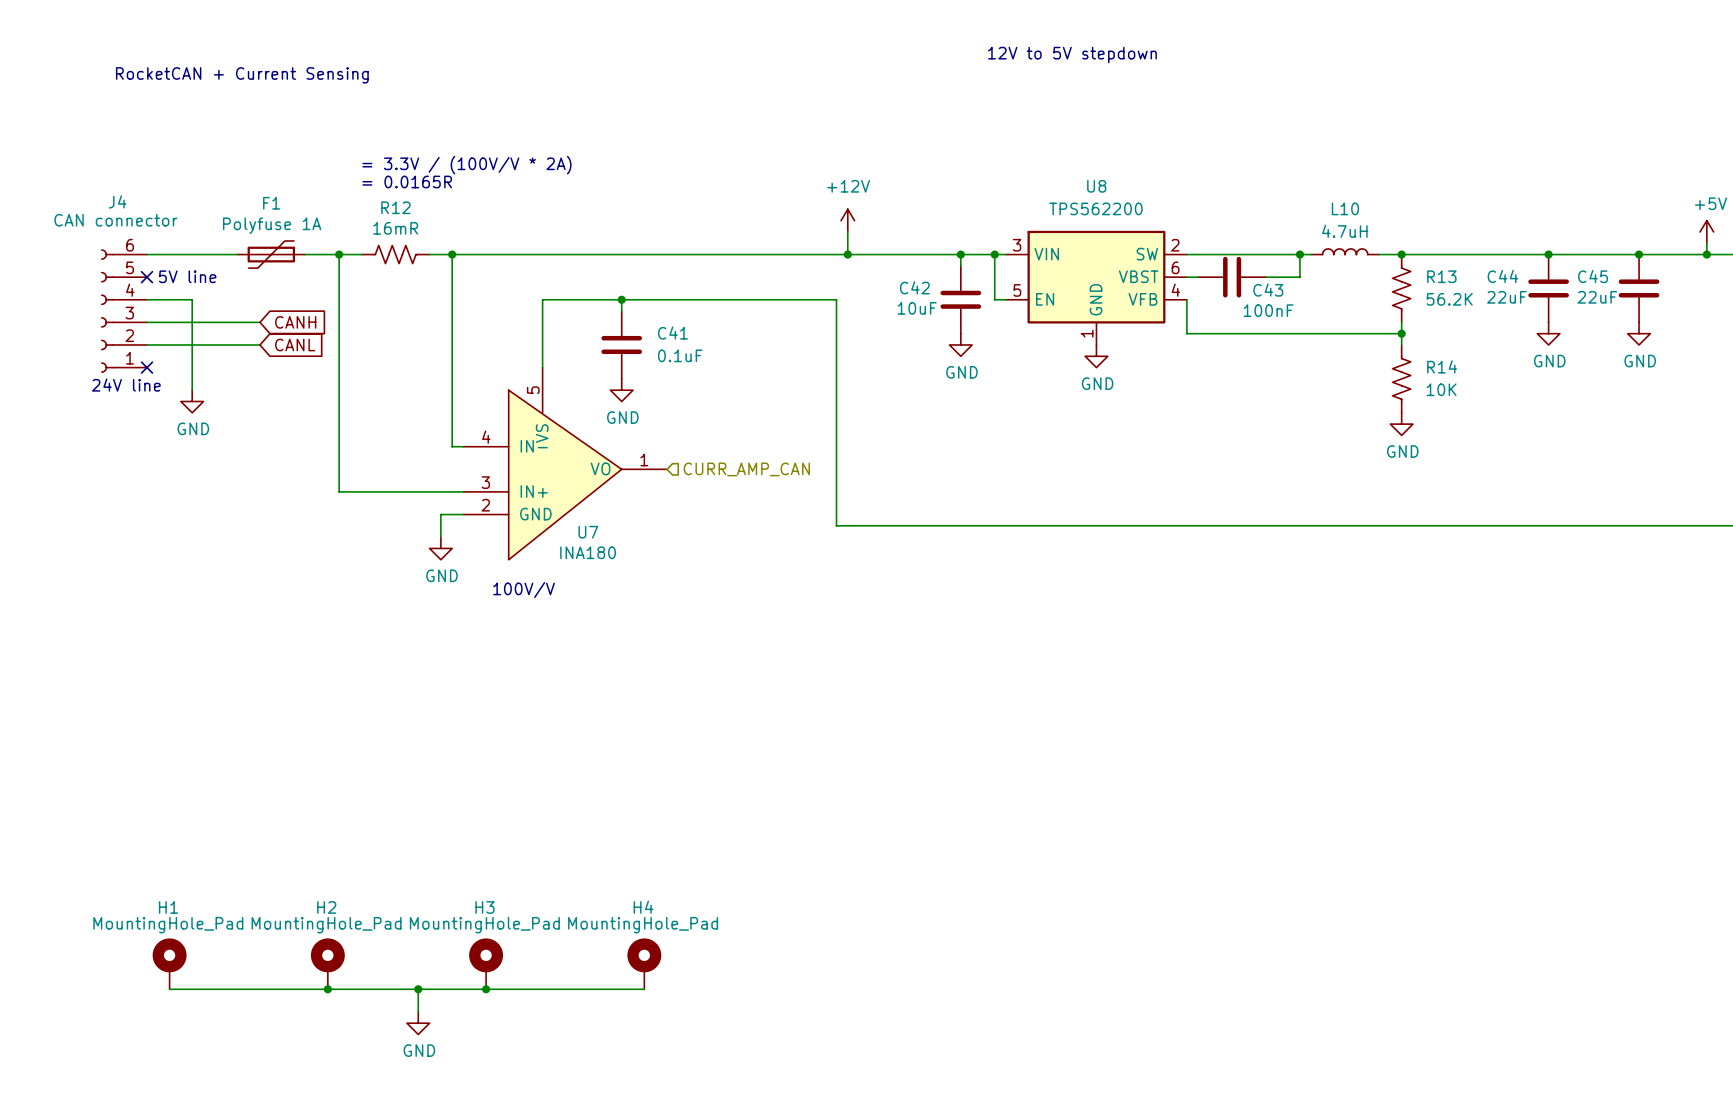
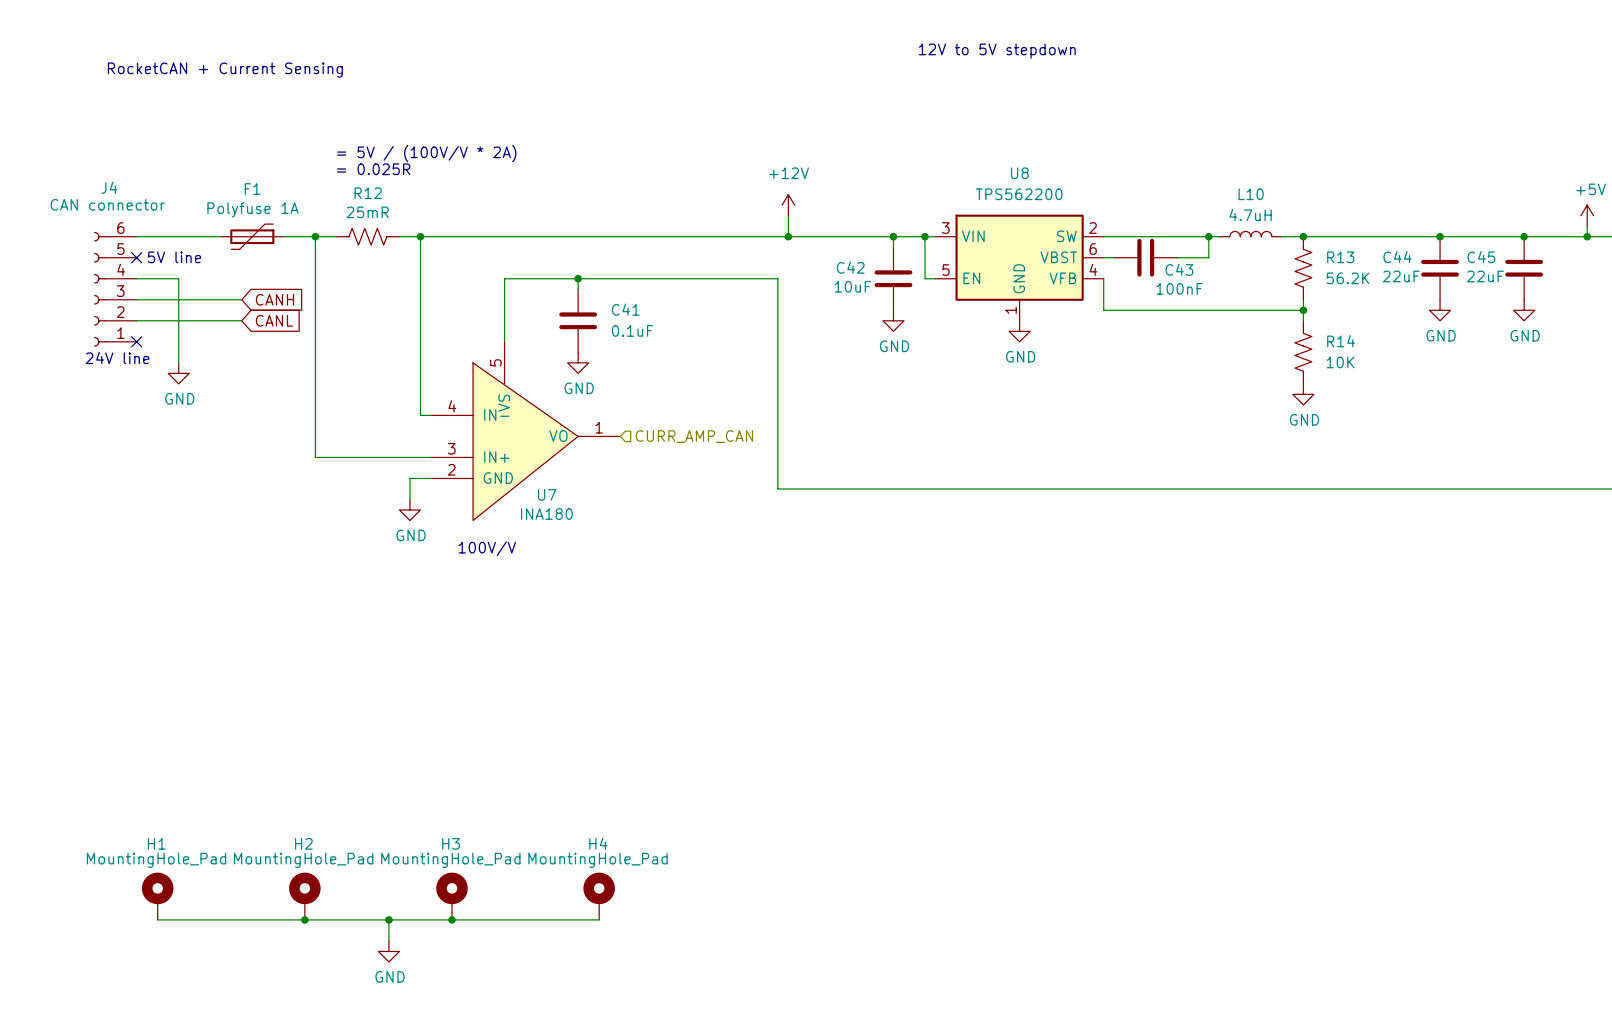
text: = 3.3V / (100V/V * 2A) (466, 165) -> = 5V / (100V/V * 2A) (426, 153)
text: = 0.0165R (407, 182) -> = 0.025R (373, 169)
R12 value: 16mR (395, 228) -> 25mR (367, 212)

